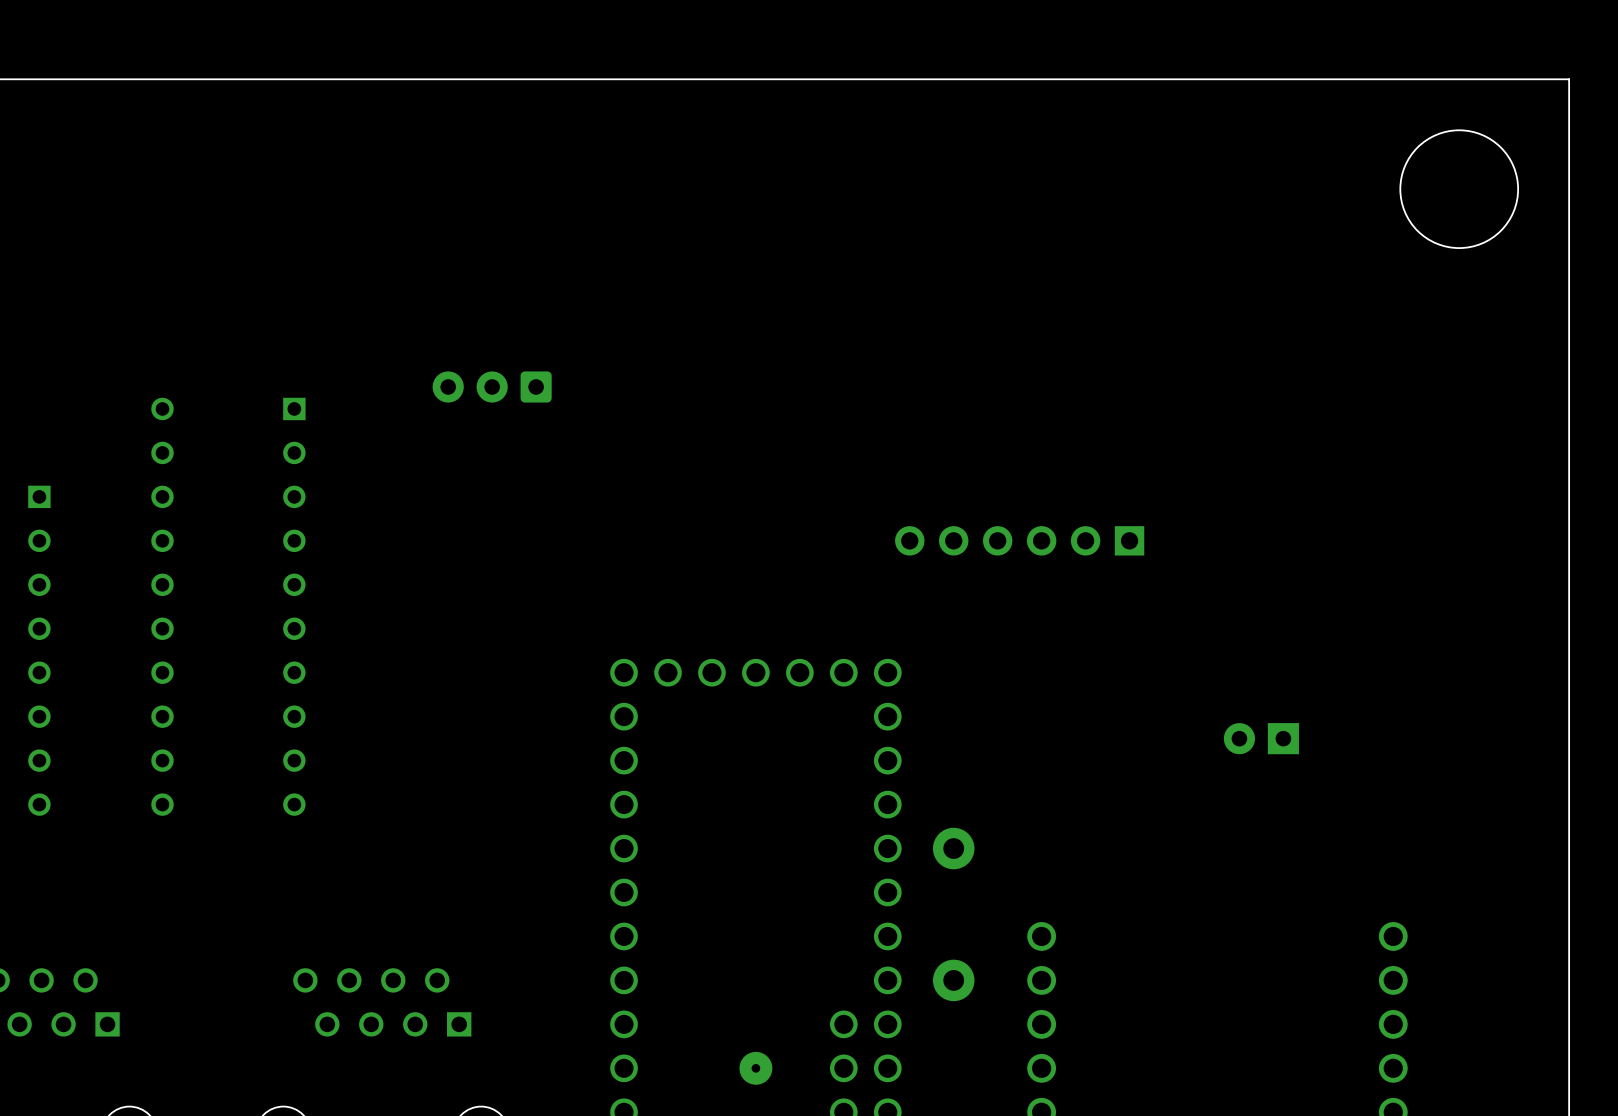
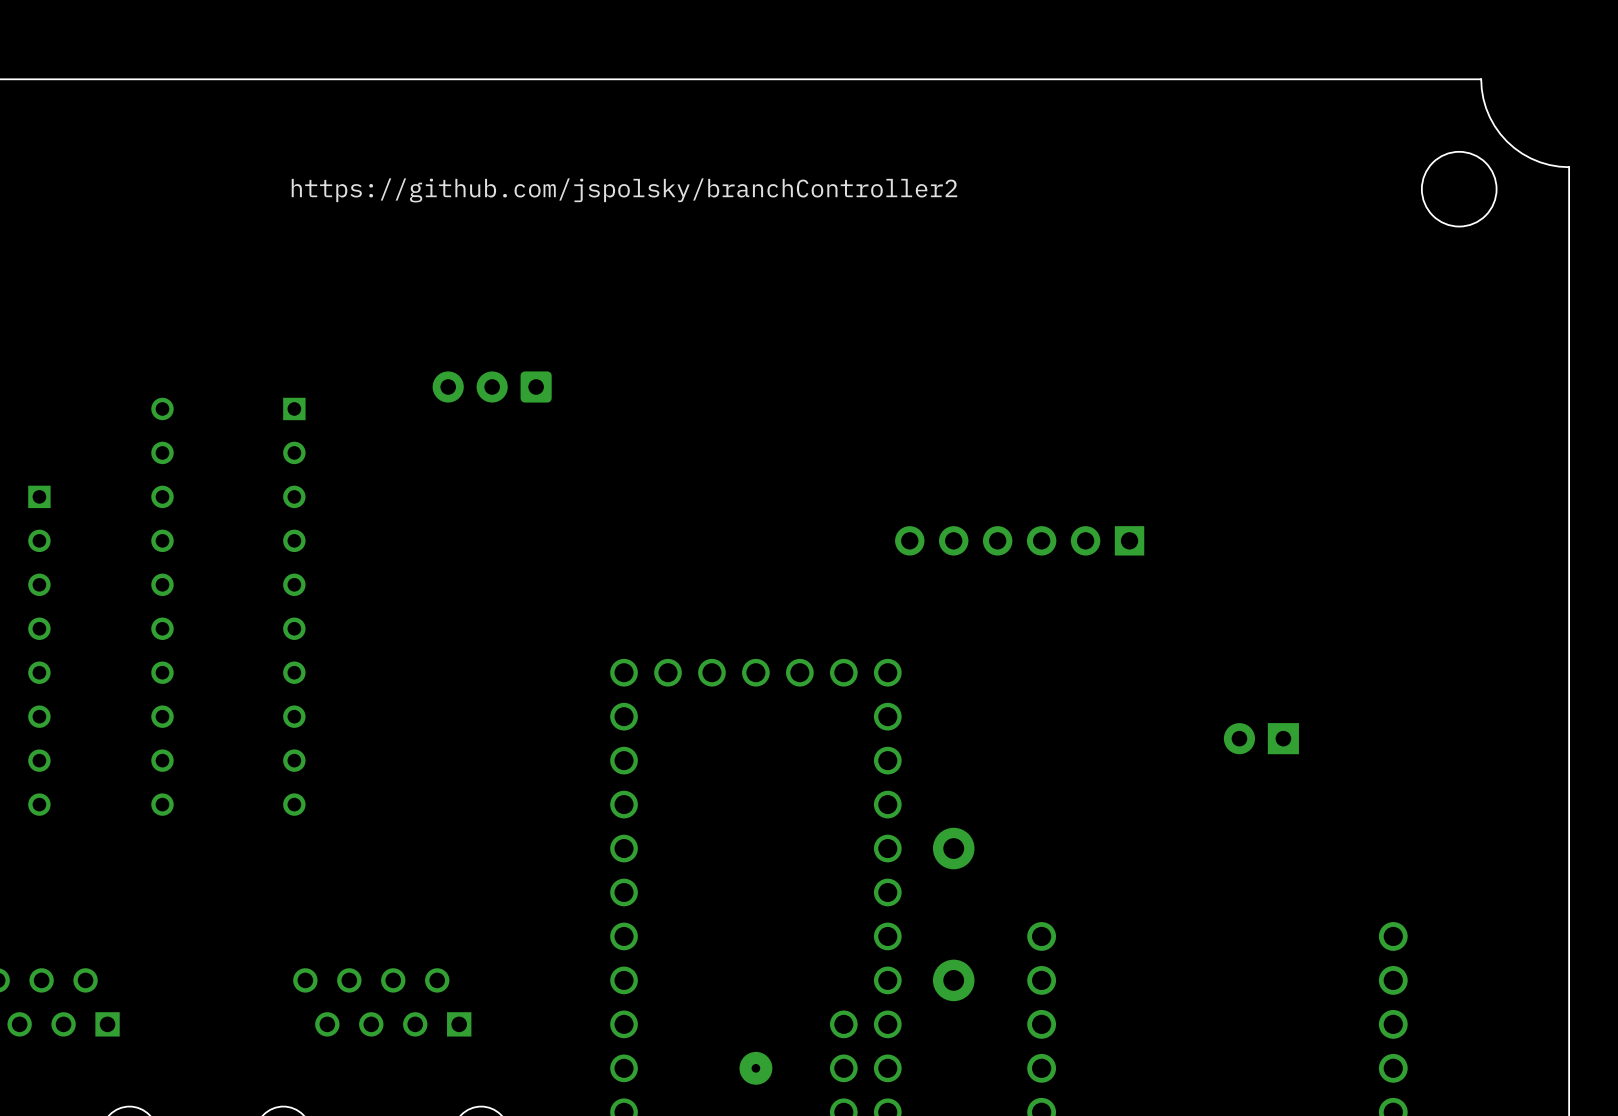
board edge: (1481, 79) (1569, 79) (1569, 167) -> (1481, 79) (1483, 98) (1489, 117) (1506, 141) (1522, 153) (1540, 162) (1569, 167)
round board edge size: [1399, 129, 1519, 249] -> [1421, 151, 1498, 227]
text: none -> https://github.com/jspolsky/branchController2 (624, 190)

